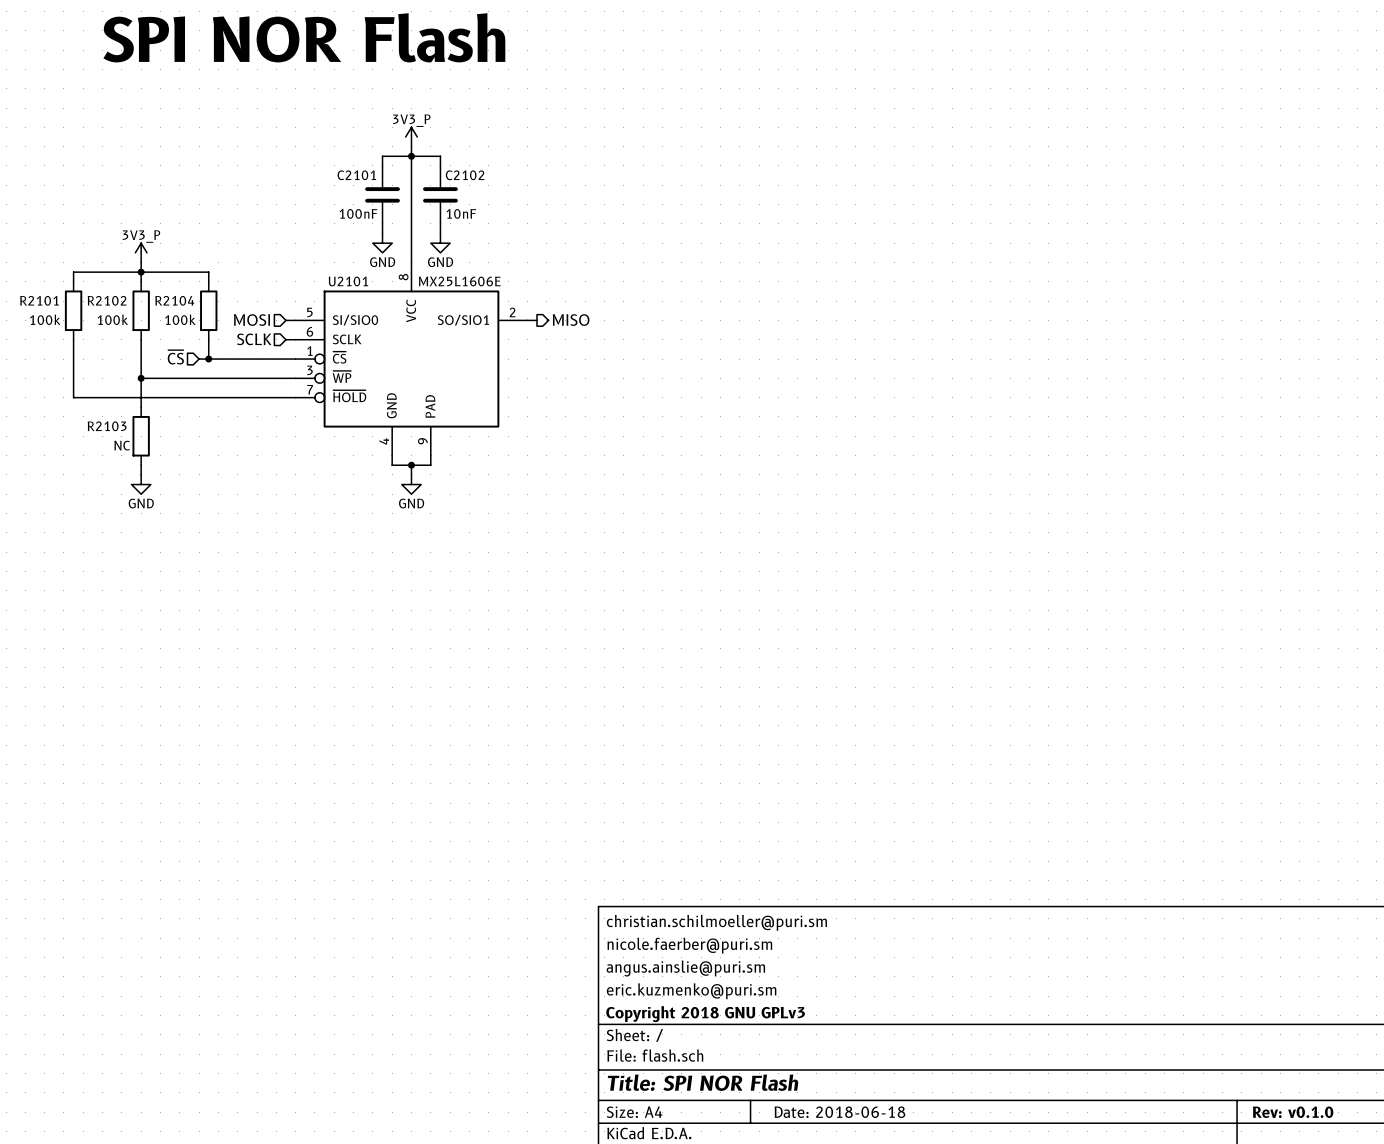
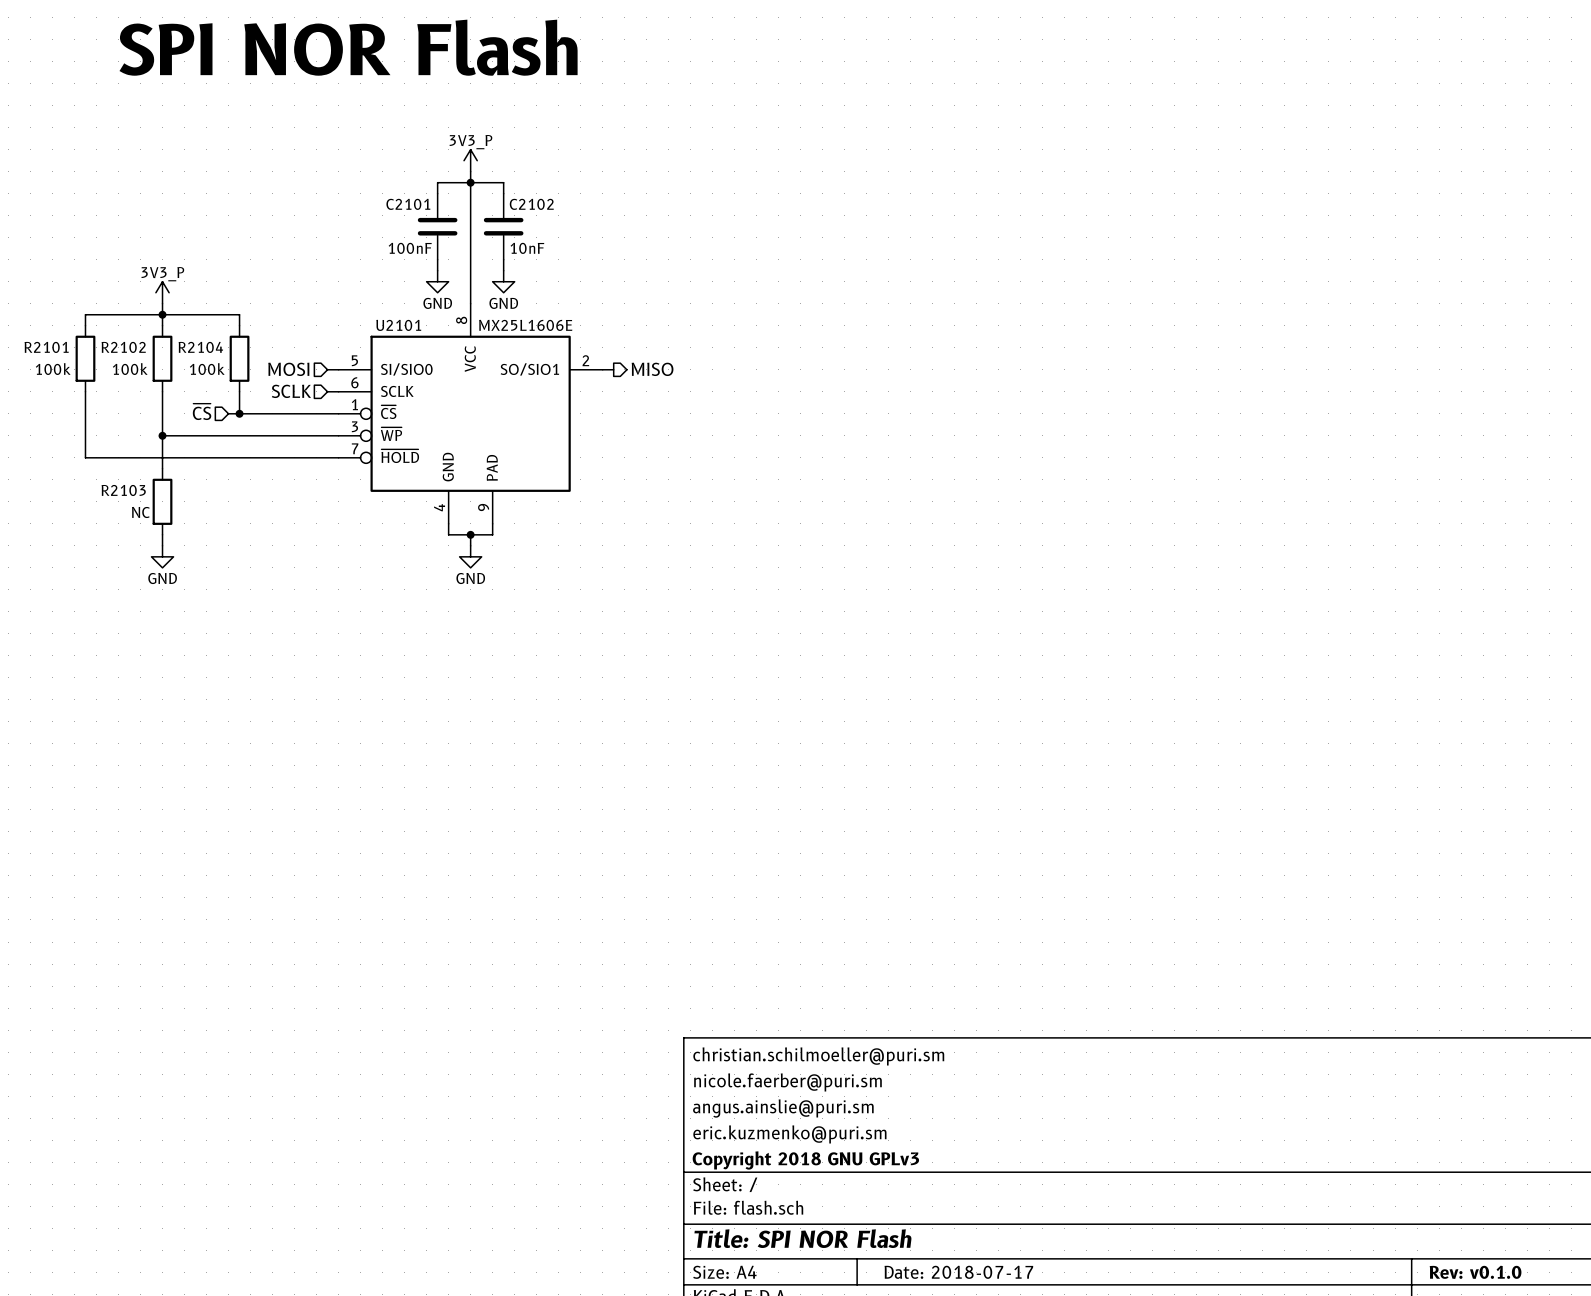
title block: Date: 2018-06-18 (839, 1112) -> Date: 2018-07-17 (958, 1272)

